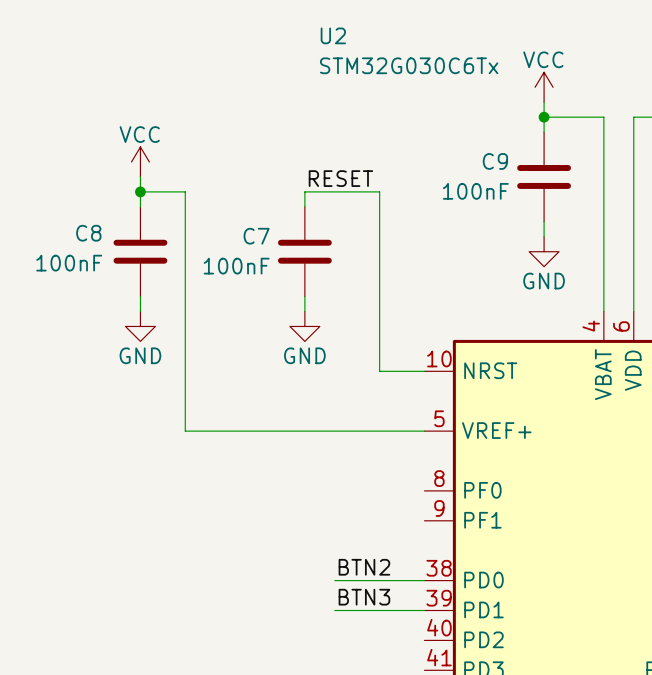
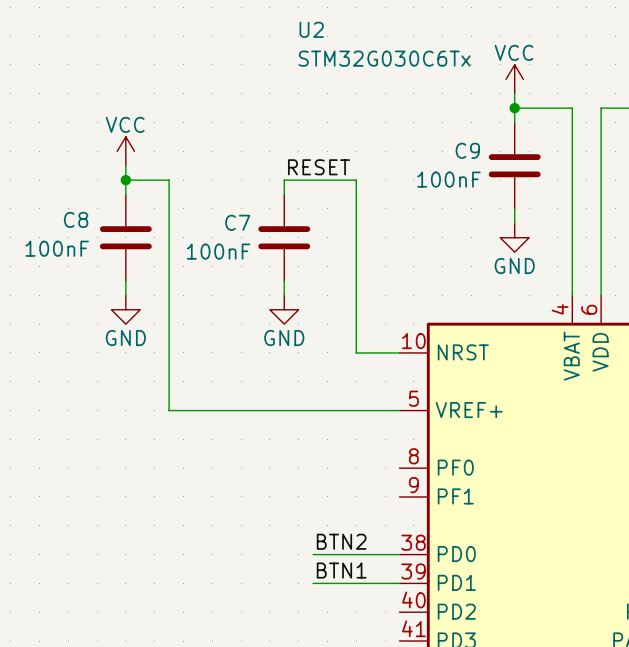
label: BTN3 (364, 597) -> BTN1 (341, 570)

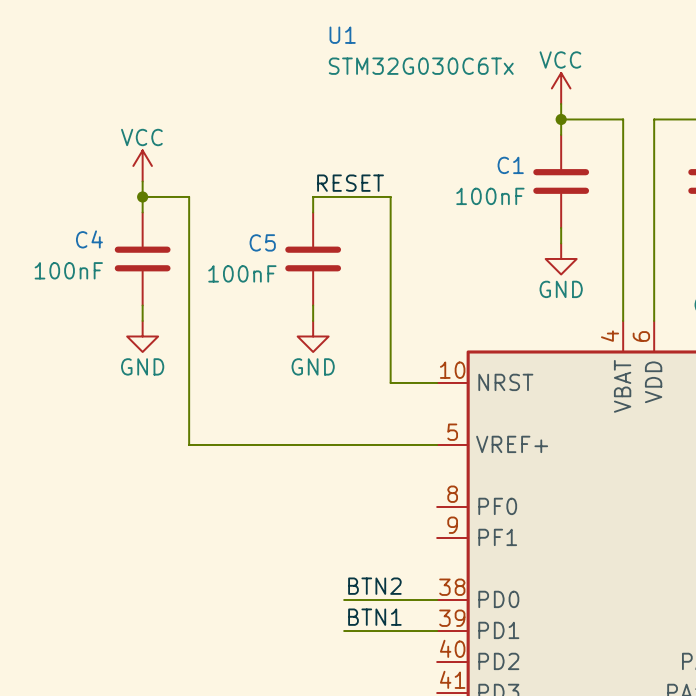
U2 name: U2 (311, 29) -> U1 (342, 35)
C9 name: C9 (467, 150) -> C1 (510, 165)
C8 name: C8 (76, 219) -> C4 (89, 239)
C7 name: C7 (237, 222) -> C5 (262, 242)

